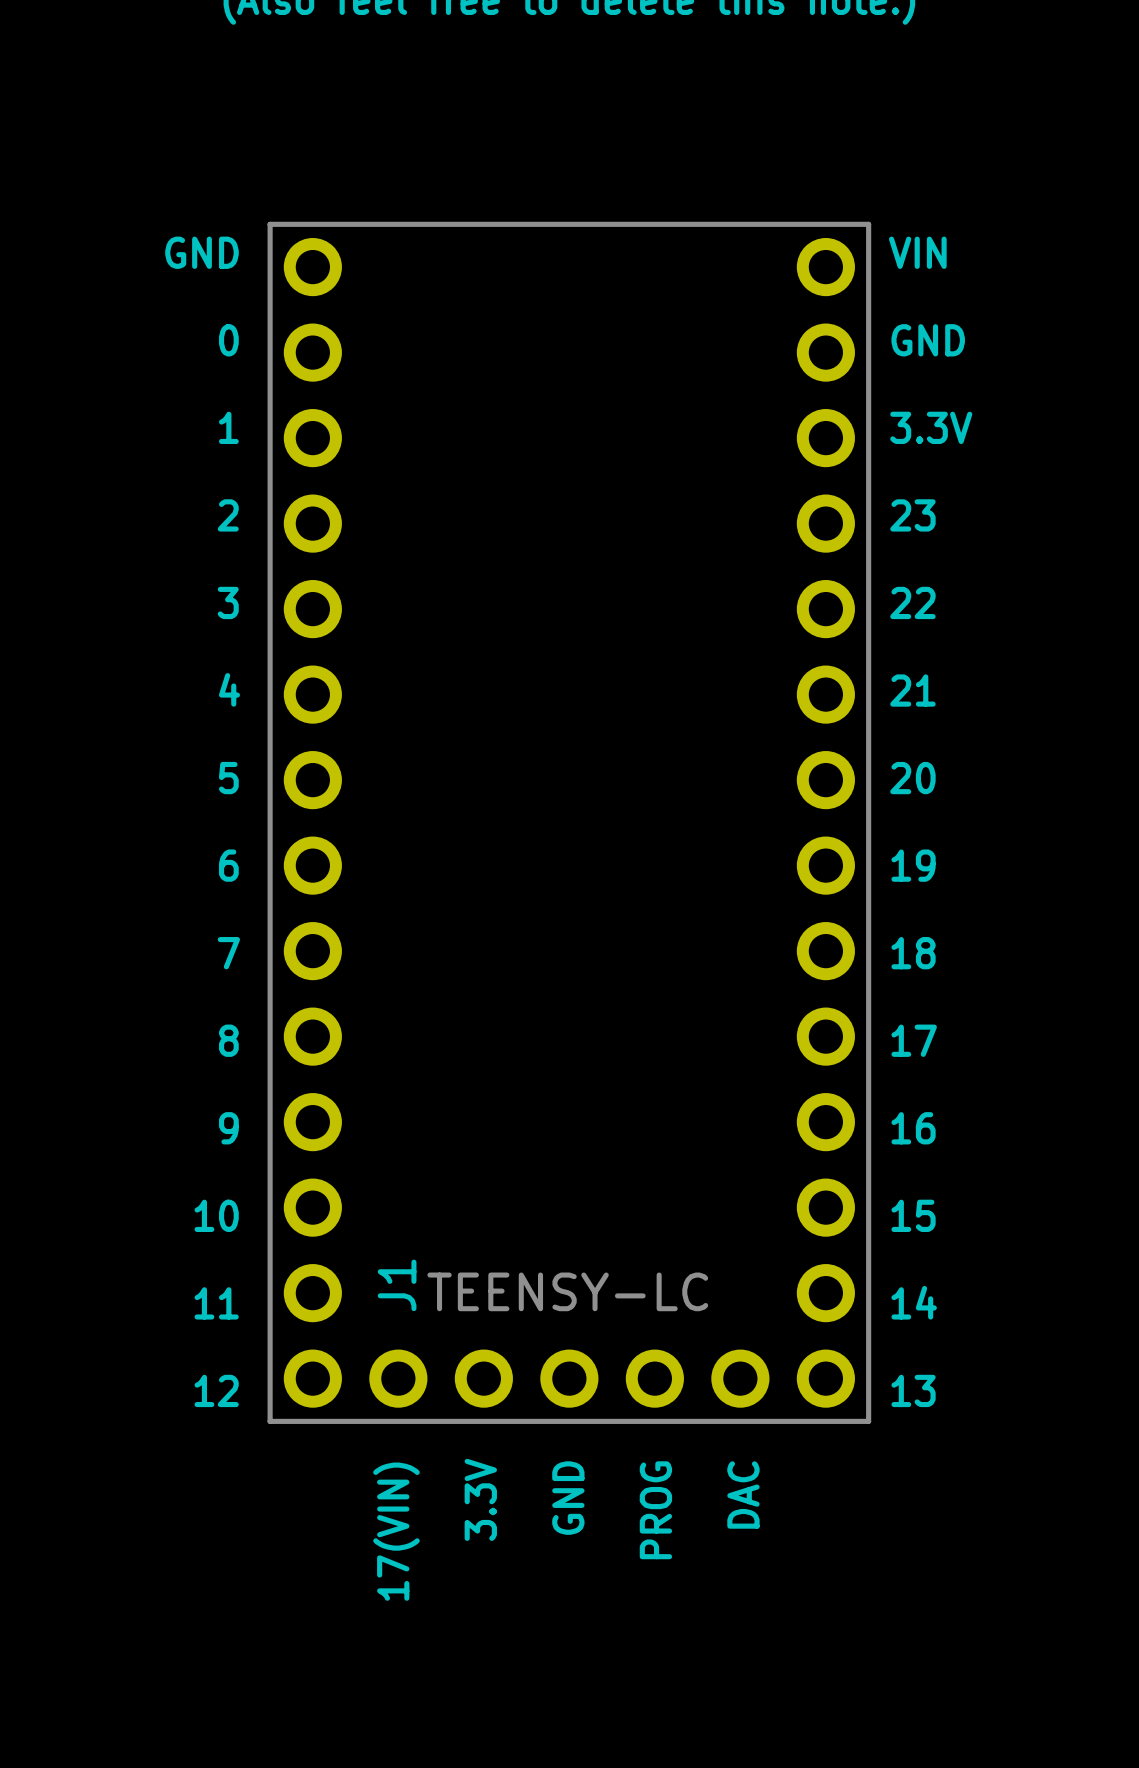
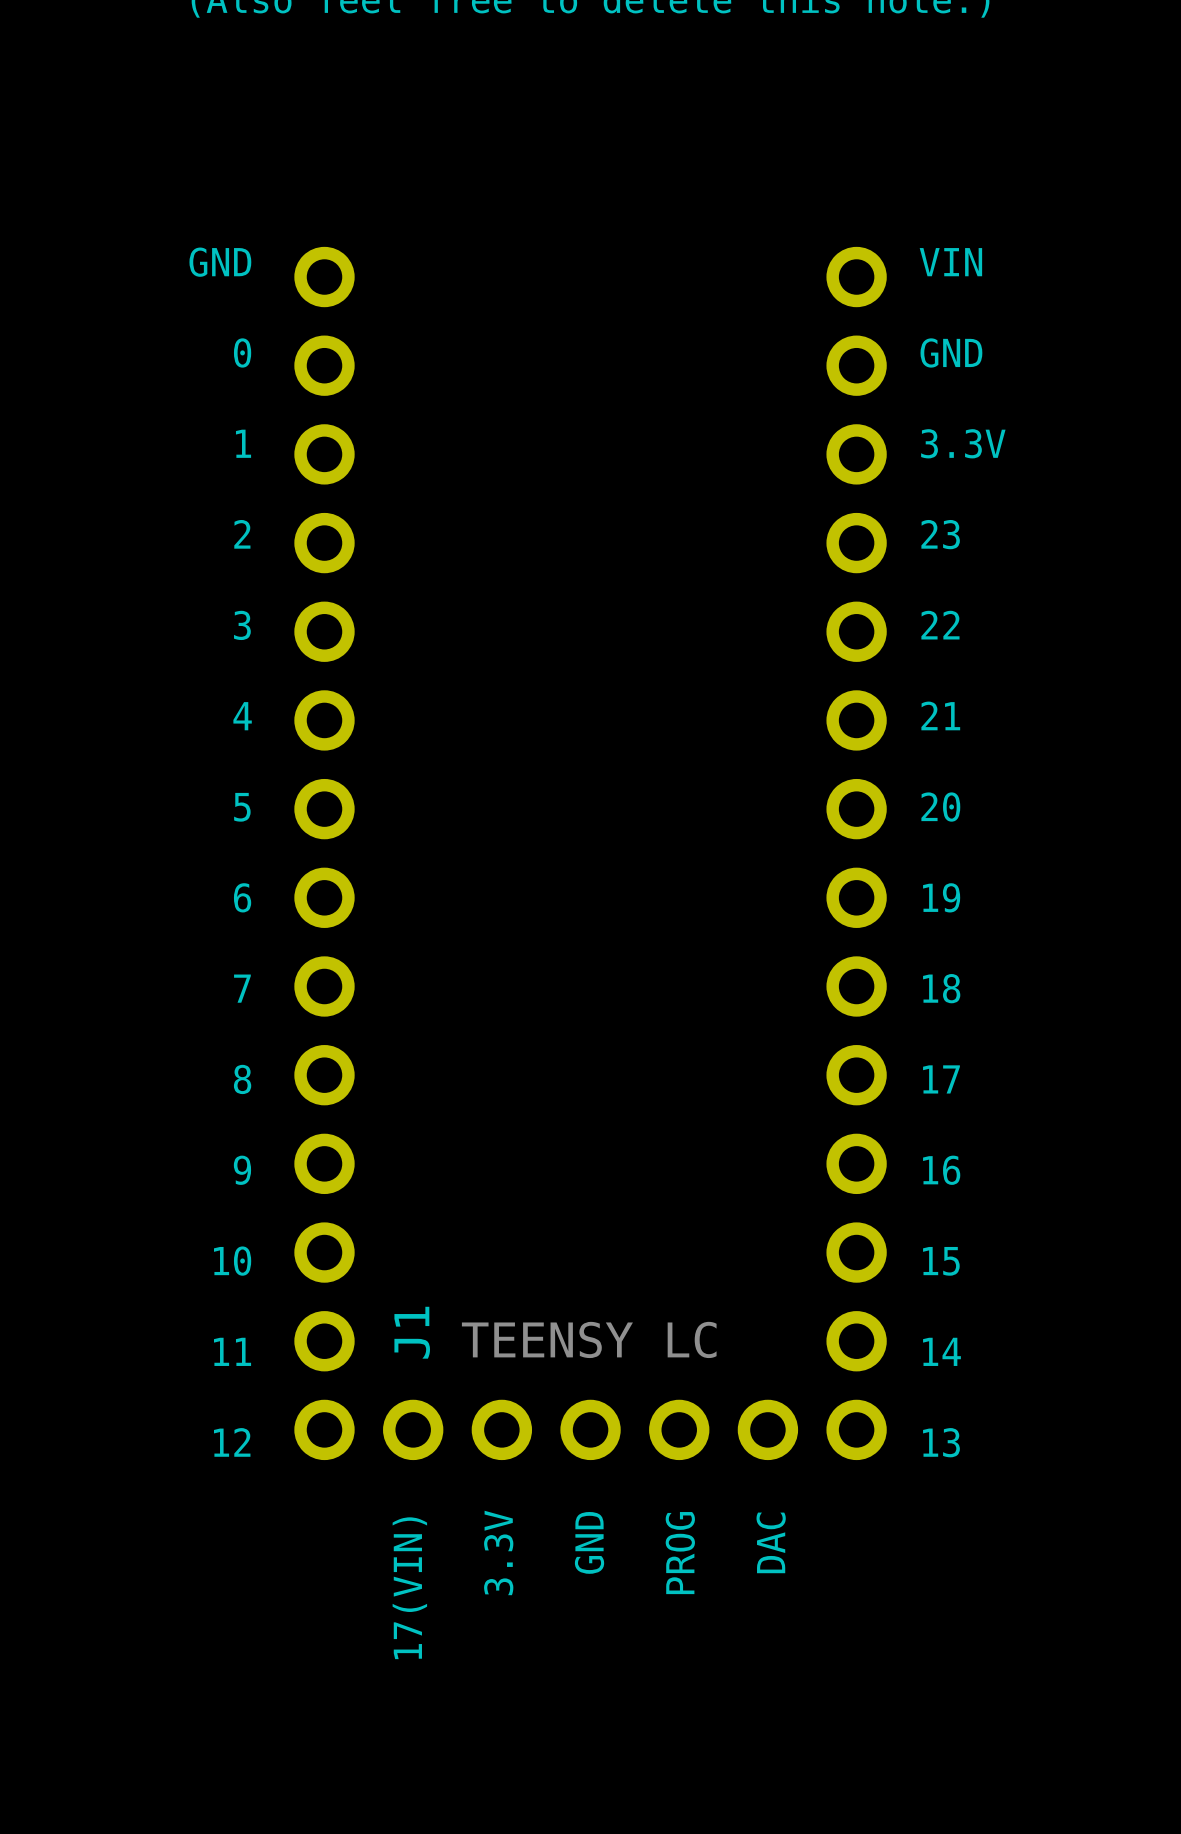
J1 footprint: [267, 221, 872, 1424] -> [294, 246, 887, 1461]
J1 value: TEENSY-LC (567, 1291) -> TEENSY LC (589, 1339)

